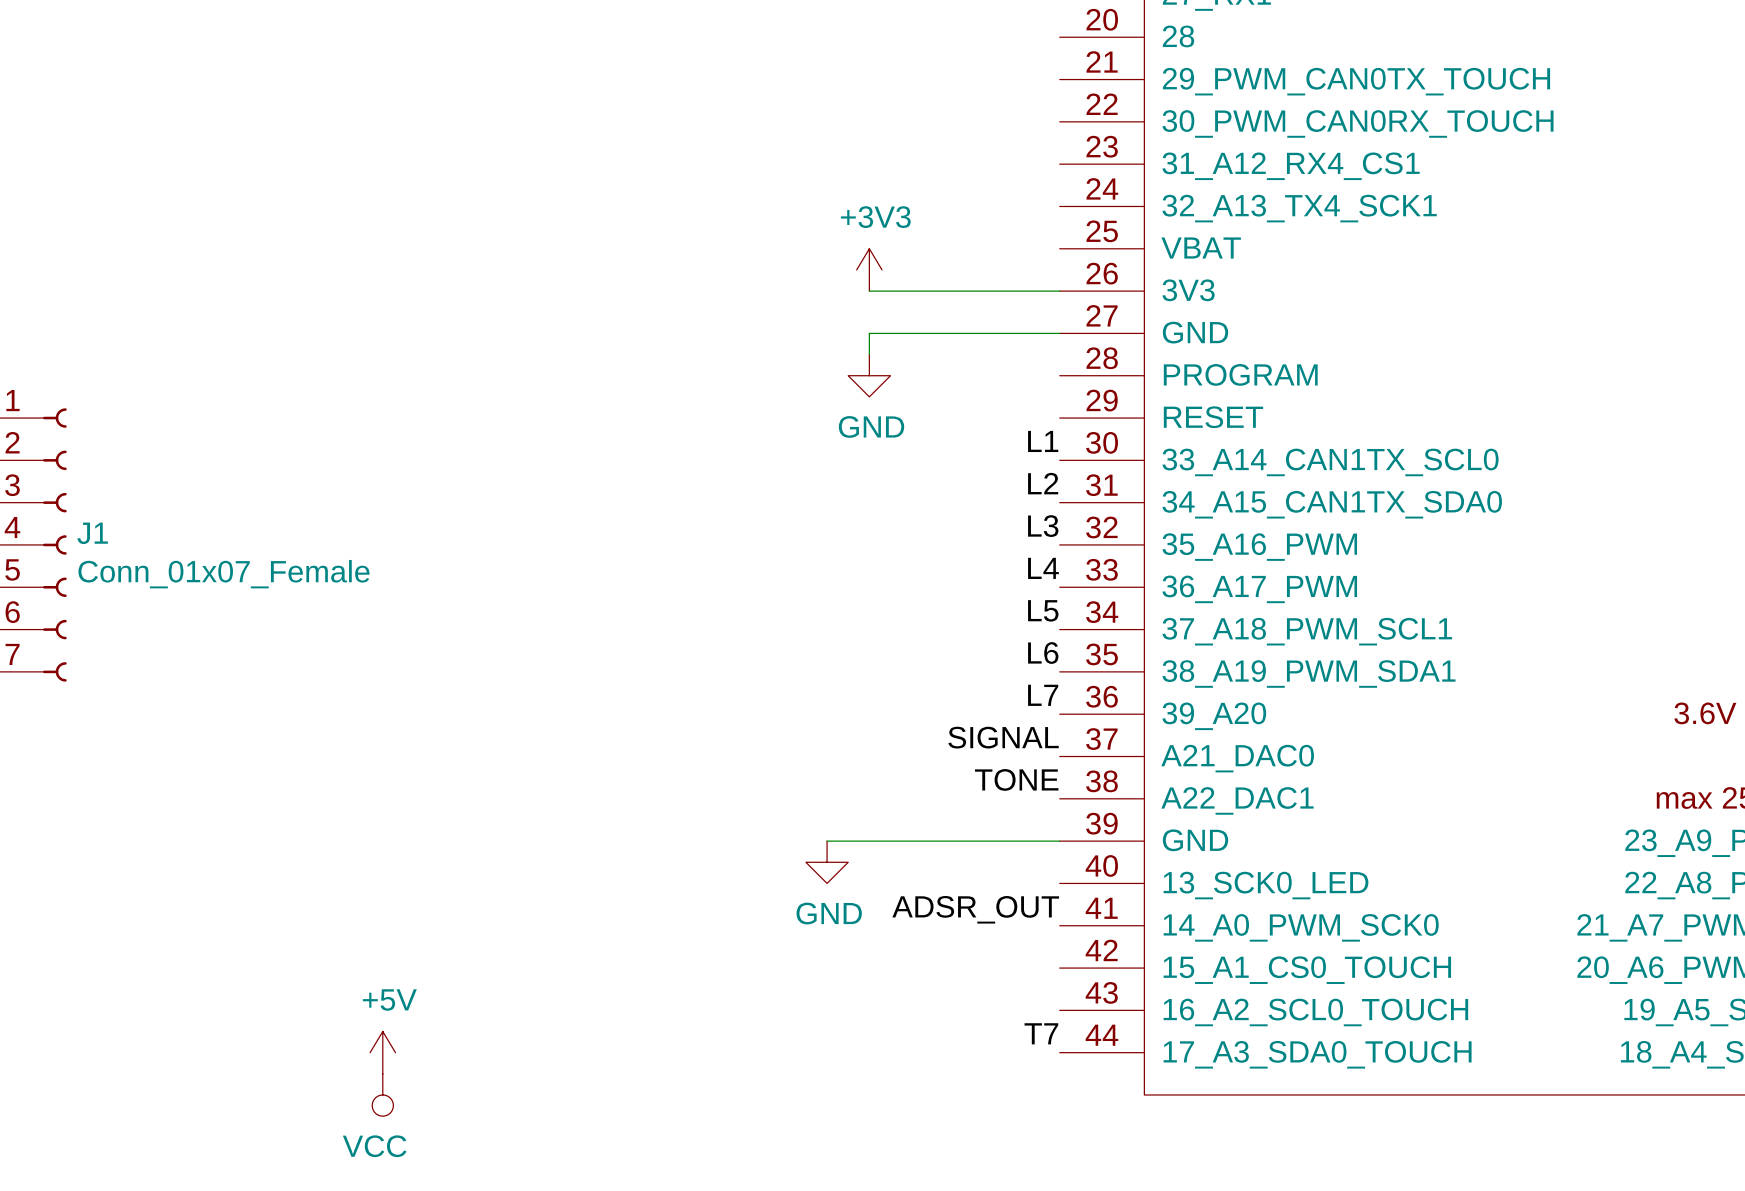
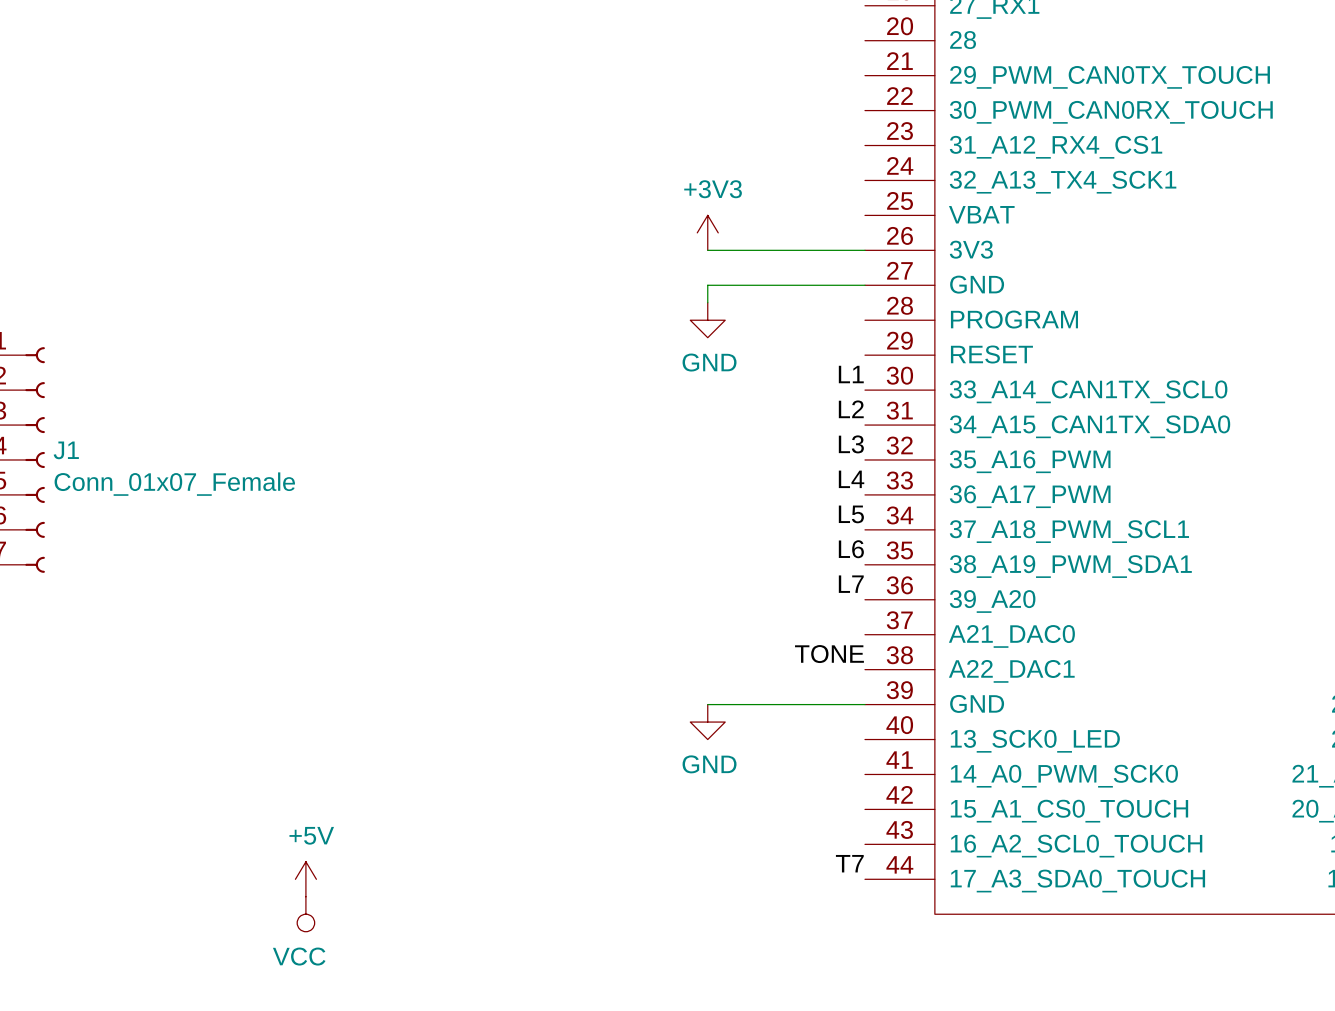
label: SIGNAL (1003, 737) -> none
wire: (827, 841) (869, 841) -> none
power symbol position: GND (827, 862) -> GND (707, 722)
label: ADSR_OUT (975, 909) -> none

